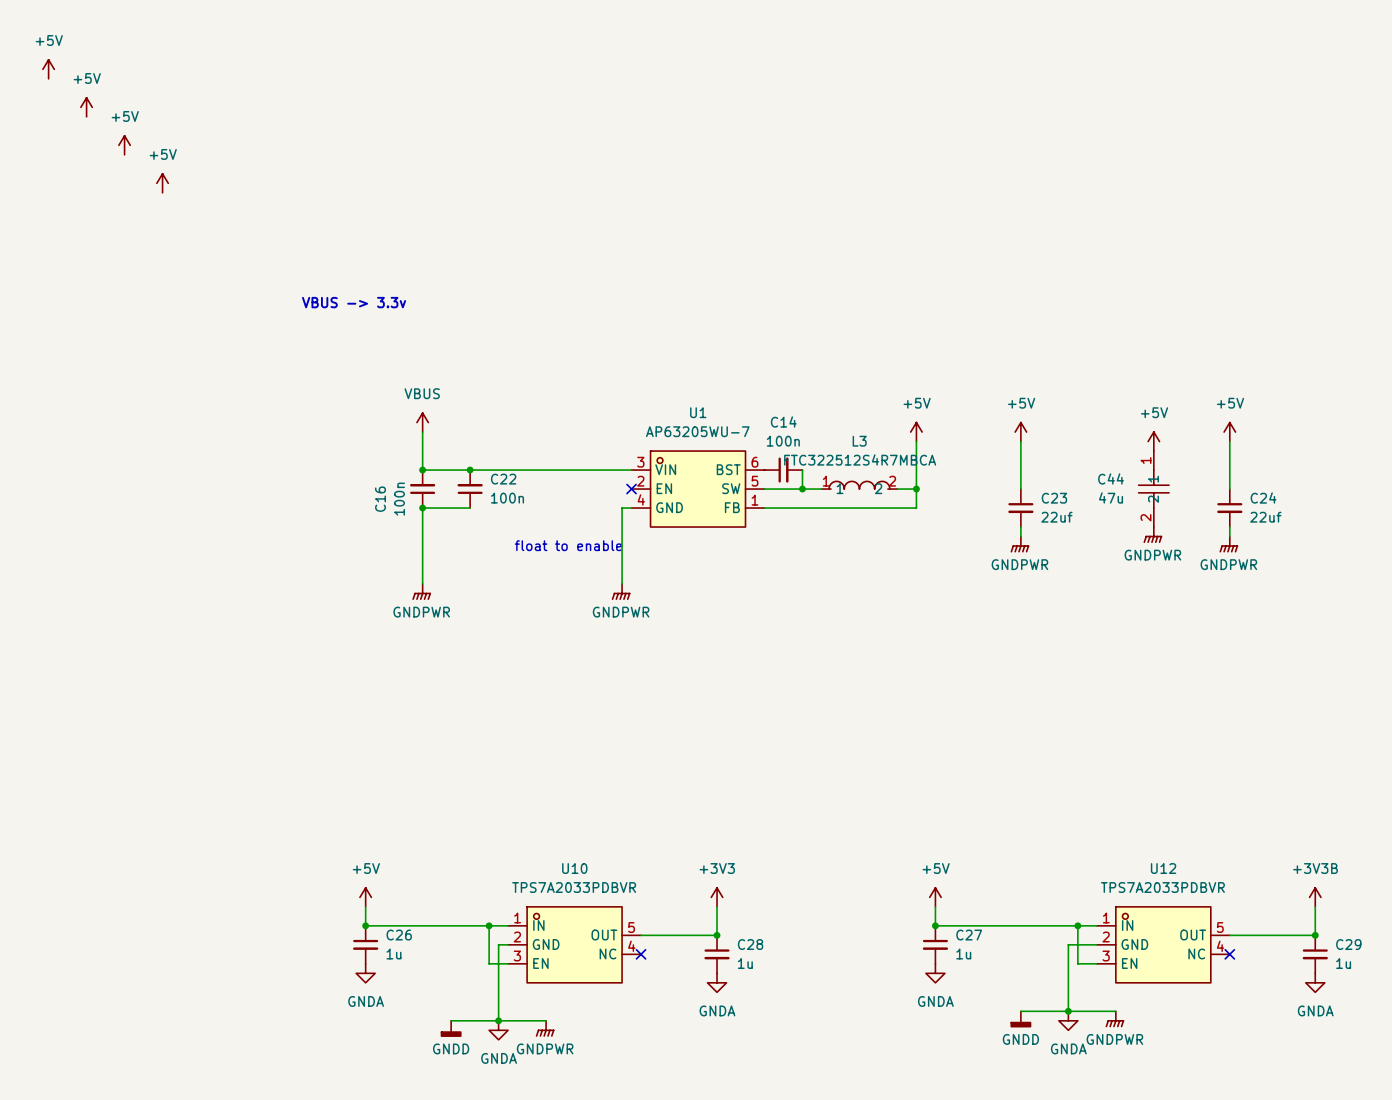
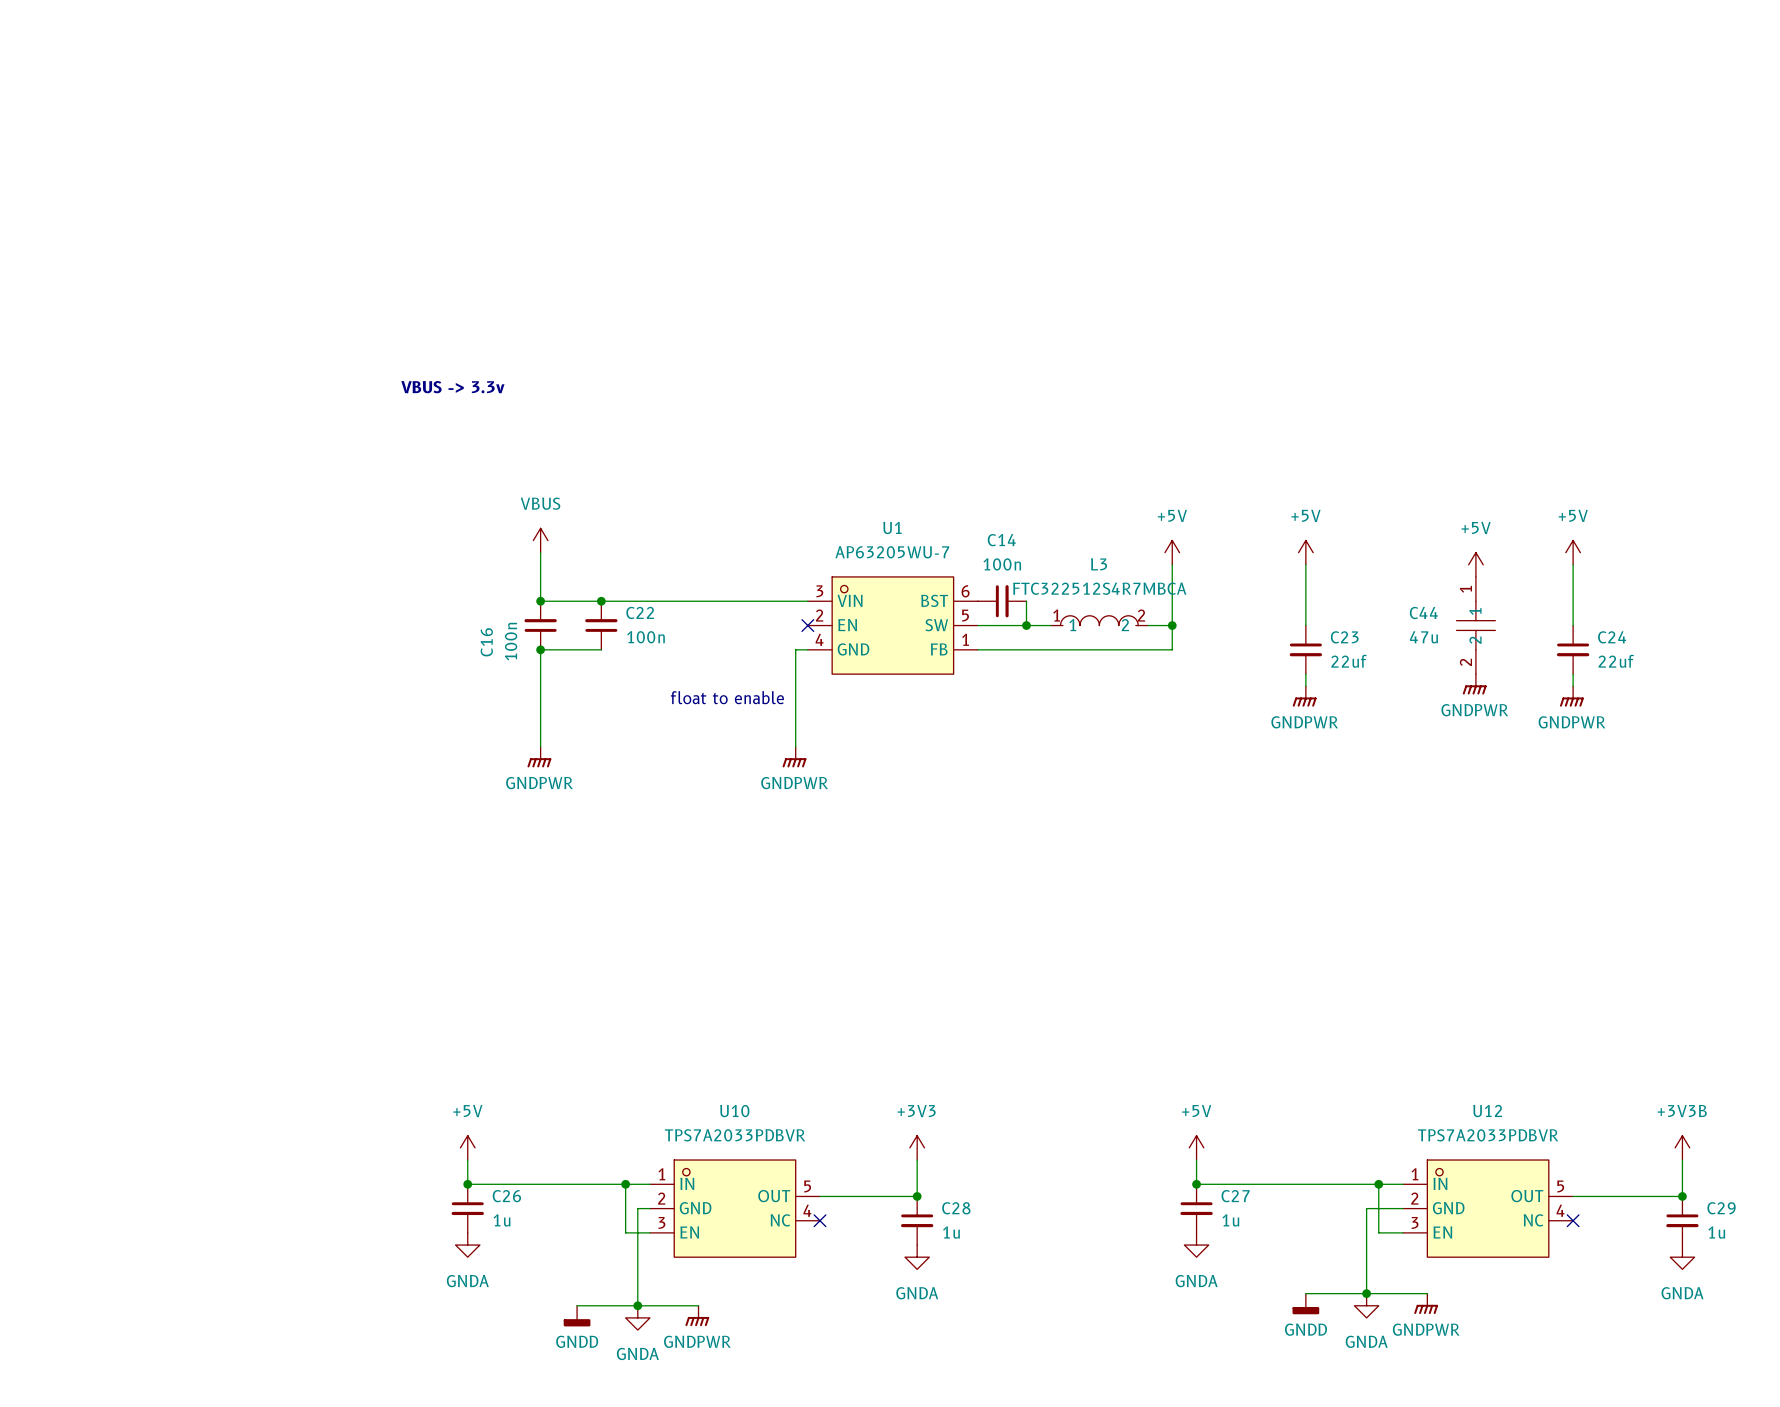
power symbol: +5V (48, 69) -> none
power symbol: +5V (86, 107) -> none
power symbol: +5V (124, 145) -> none
power symbol: +5V (162, 183) -> none

